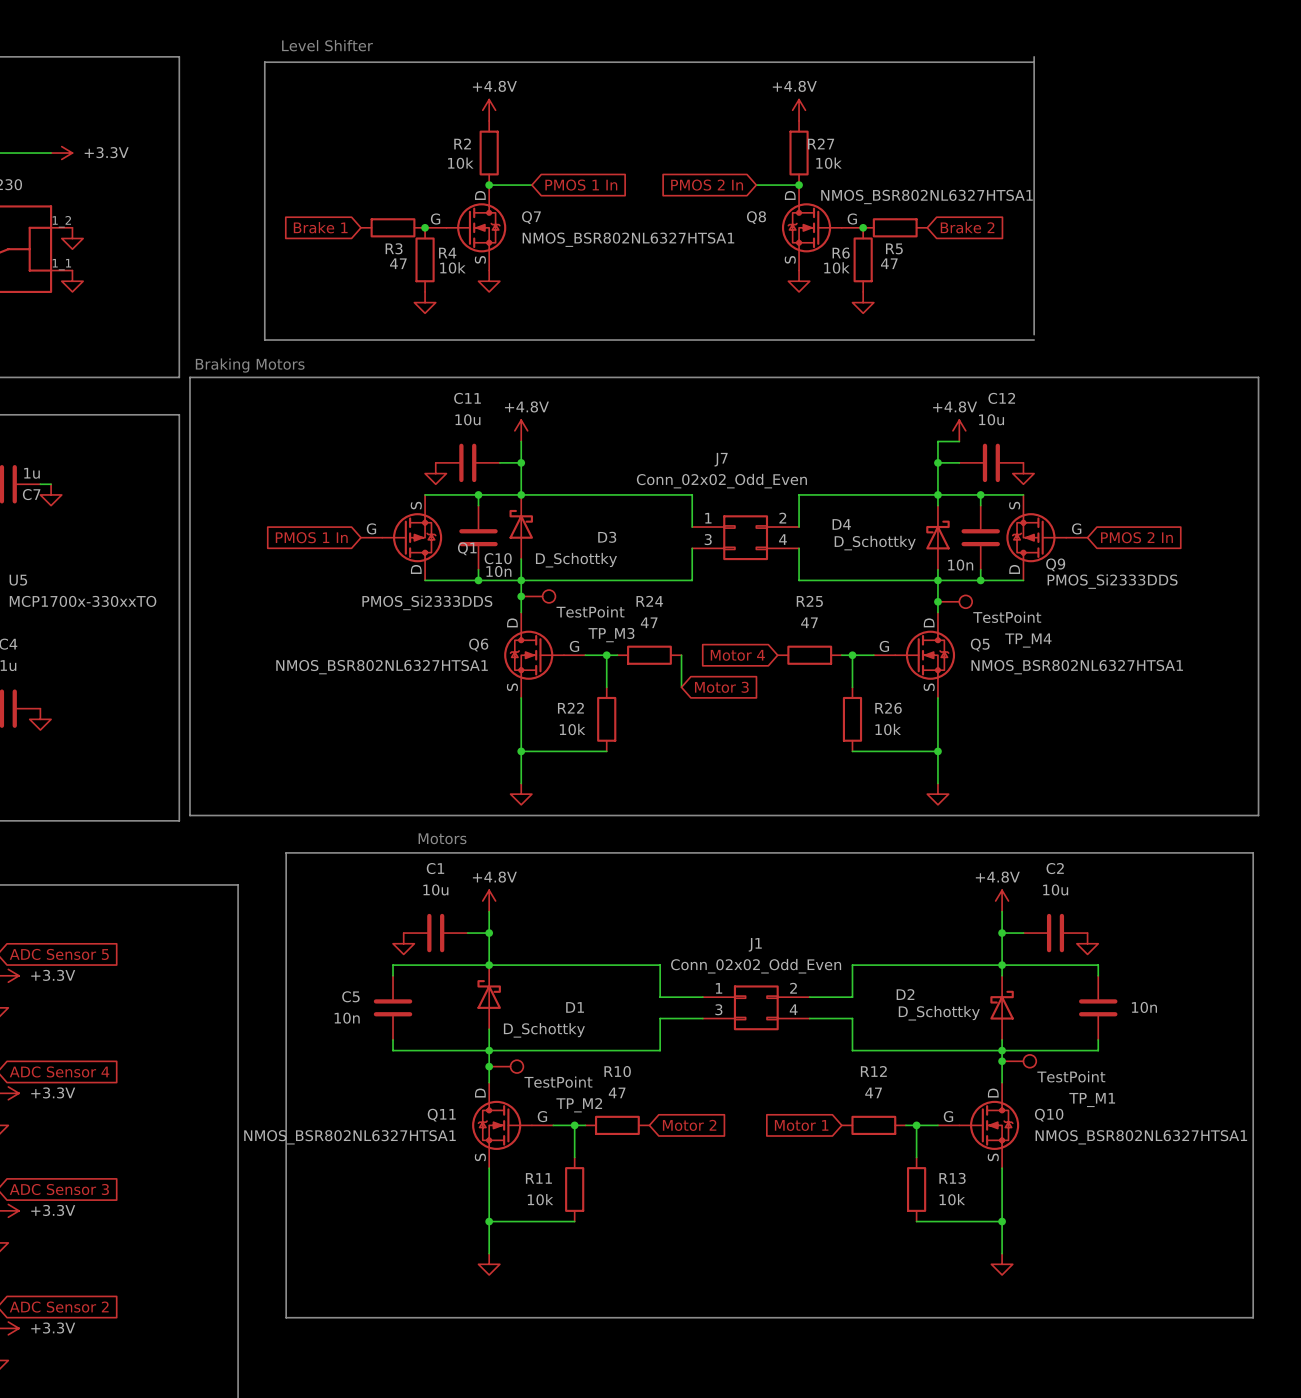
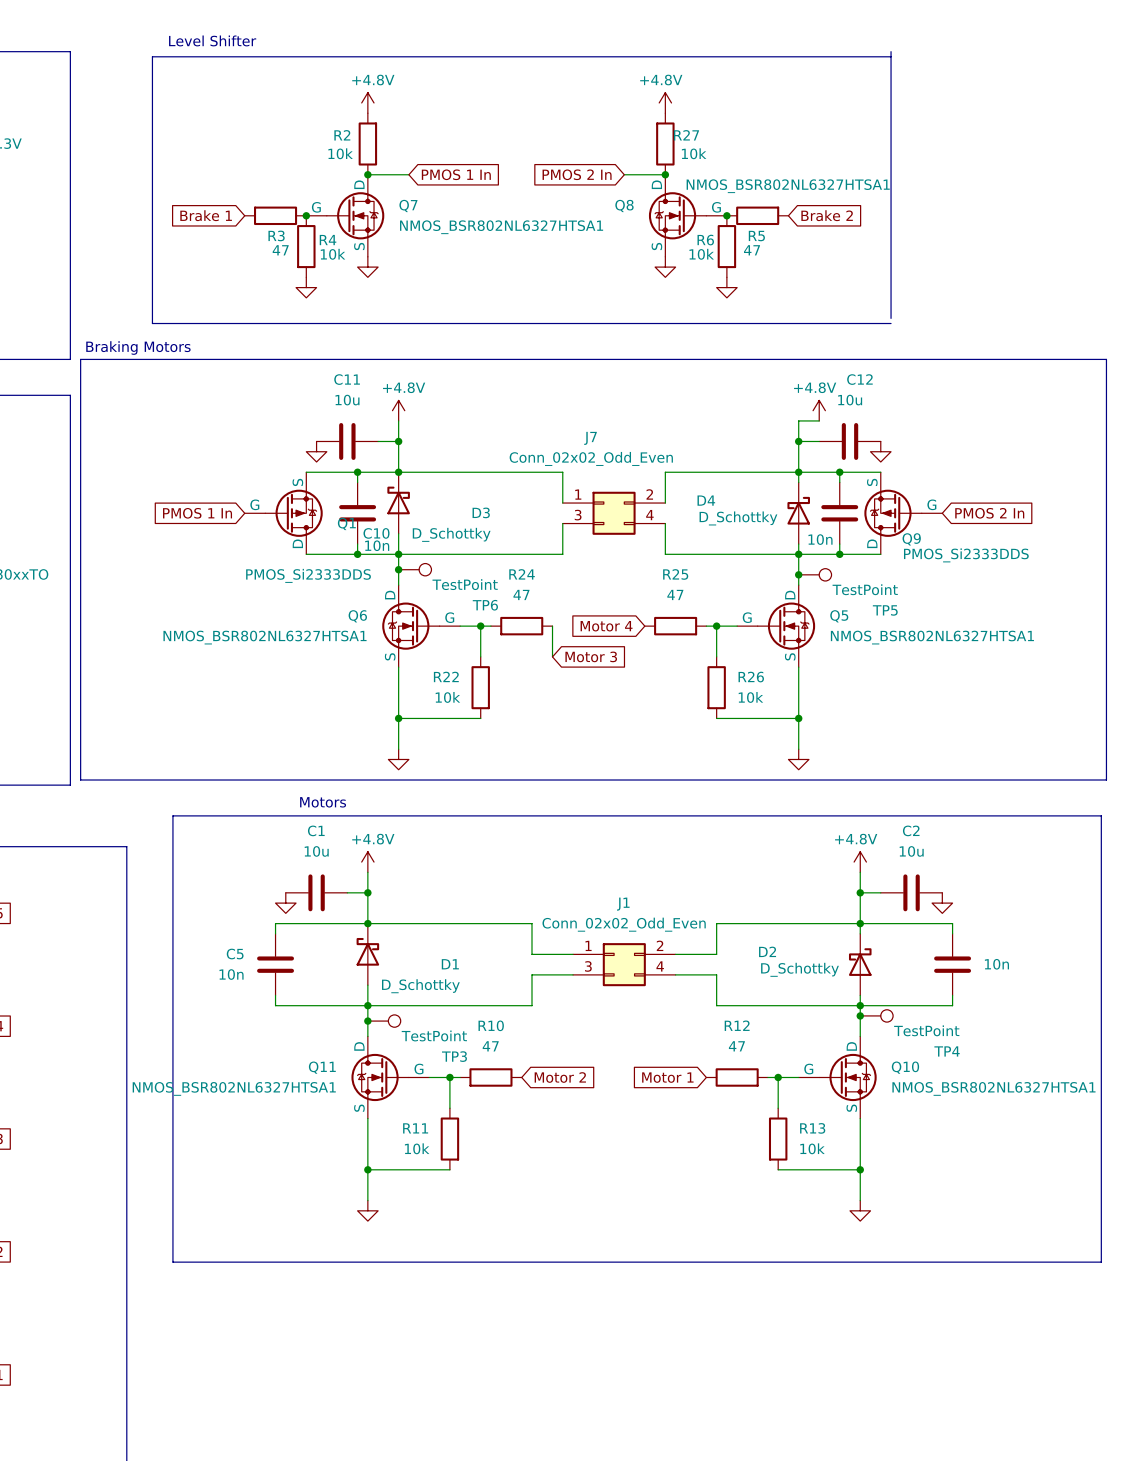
TP_M3 name: TP_M3 (611, 635) -> TP6 (485, 605)
TP_M4 name: TP_M4 (1028, 640) -> TP5 (885, 610)
TP_M1 name: TP_M1 (1092, 1100) -> TP4 (947, 1051)
TP_M2 name: TP_M2 (579, 1105) -> TP3 (454, 1056)

